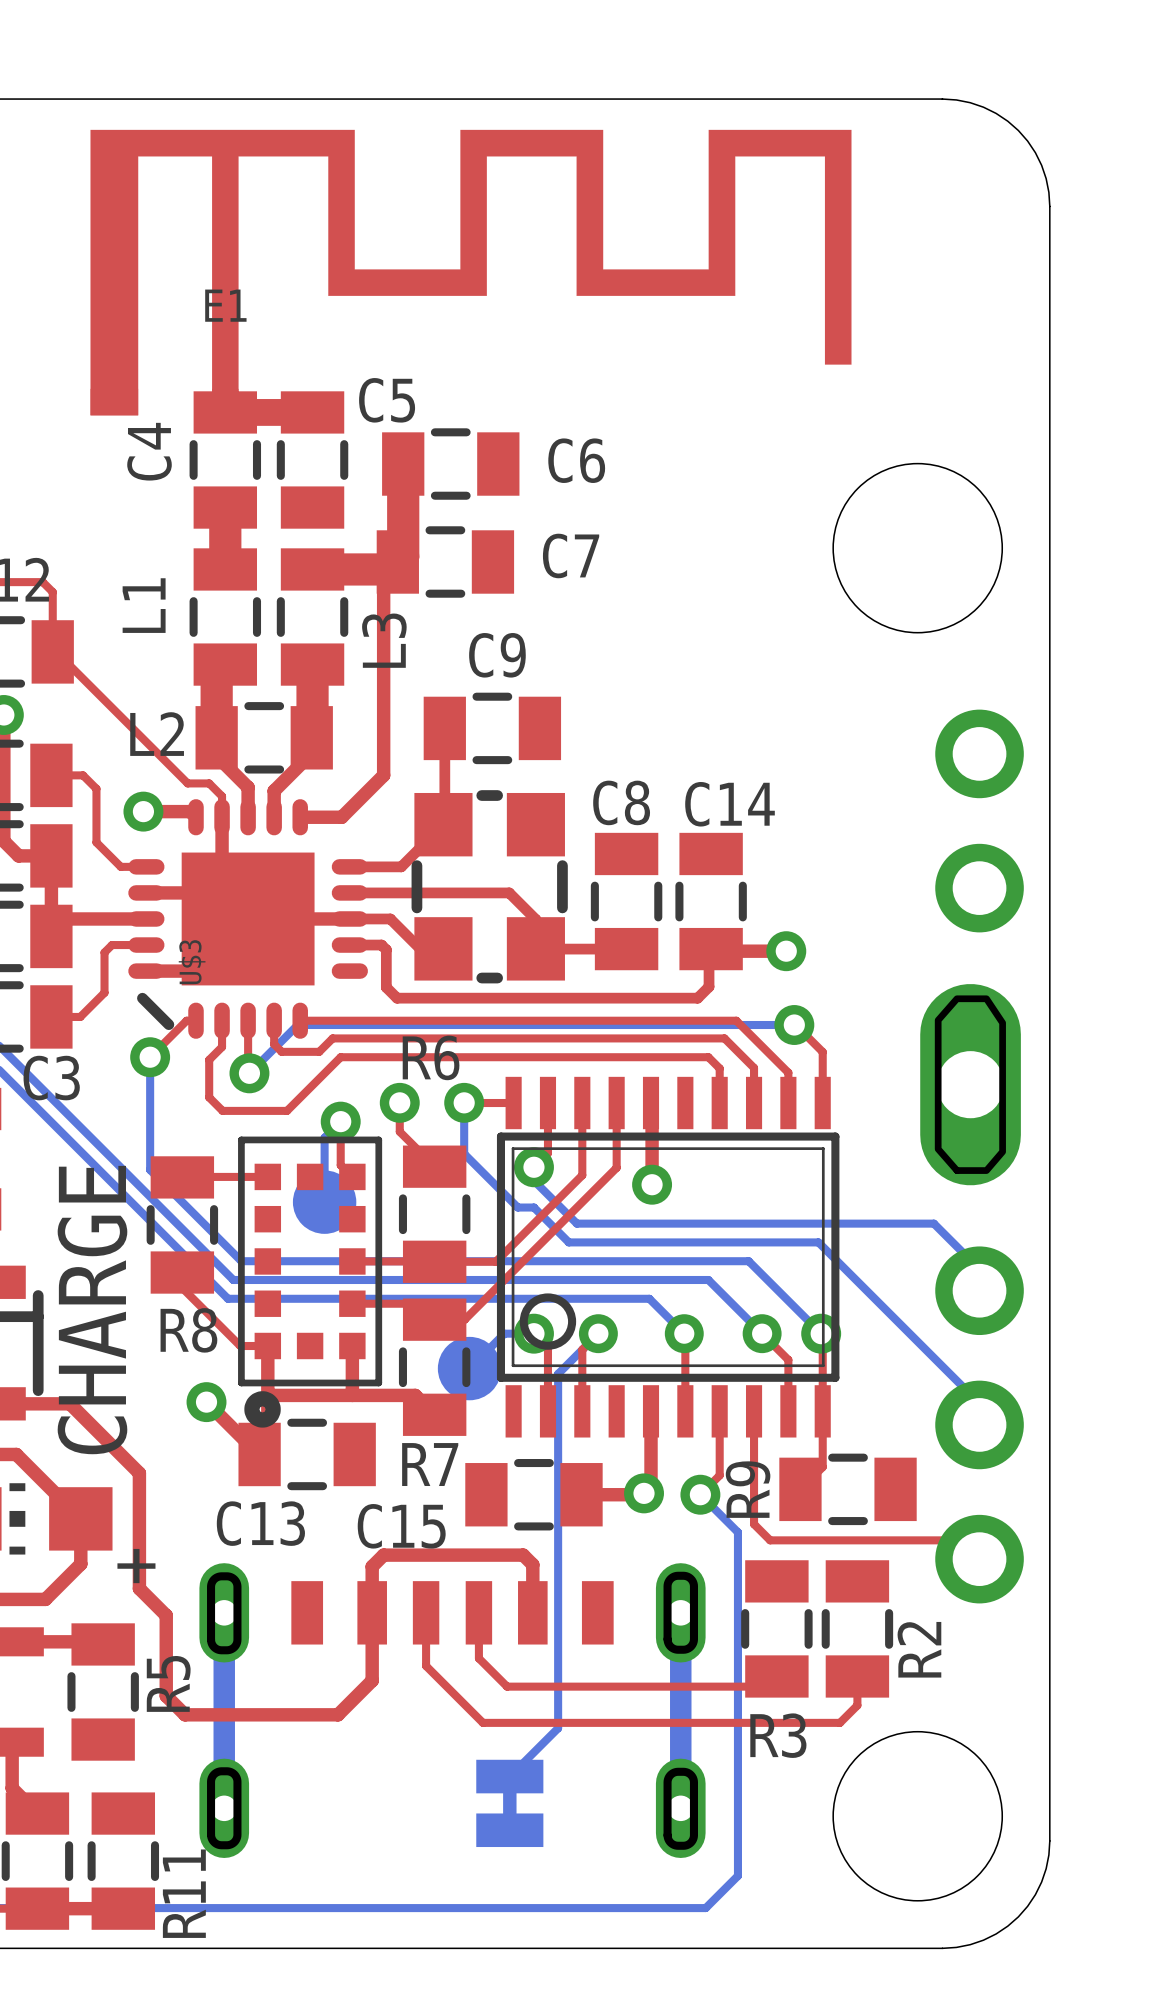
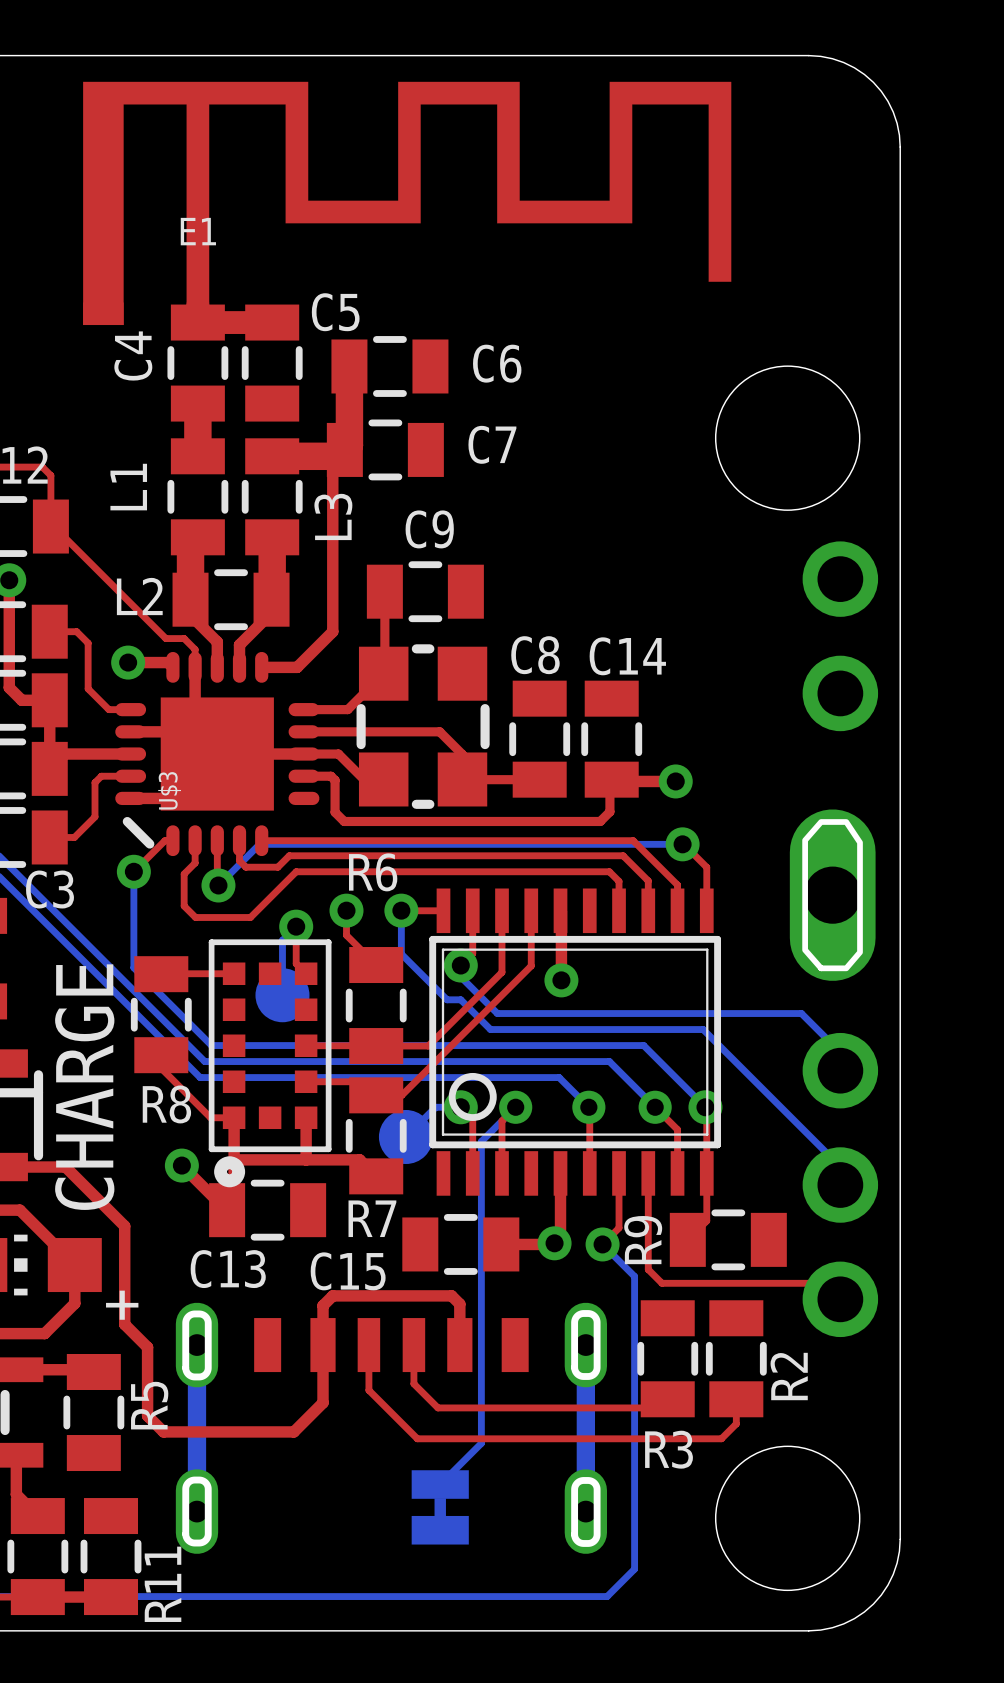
part position: (979, 821) -> (840, 636)

